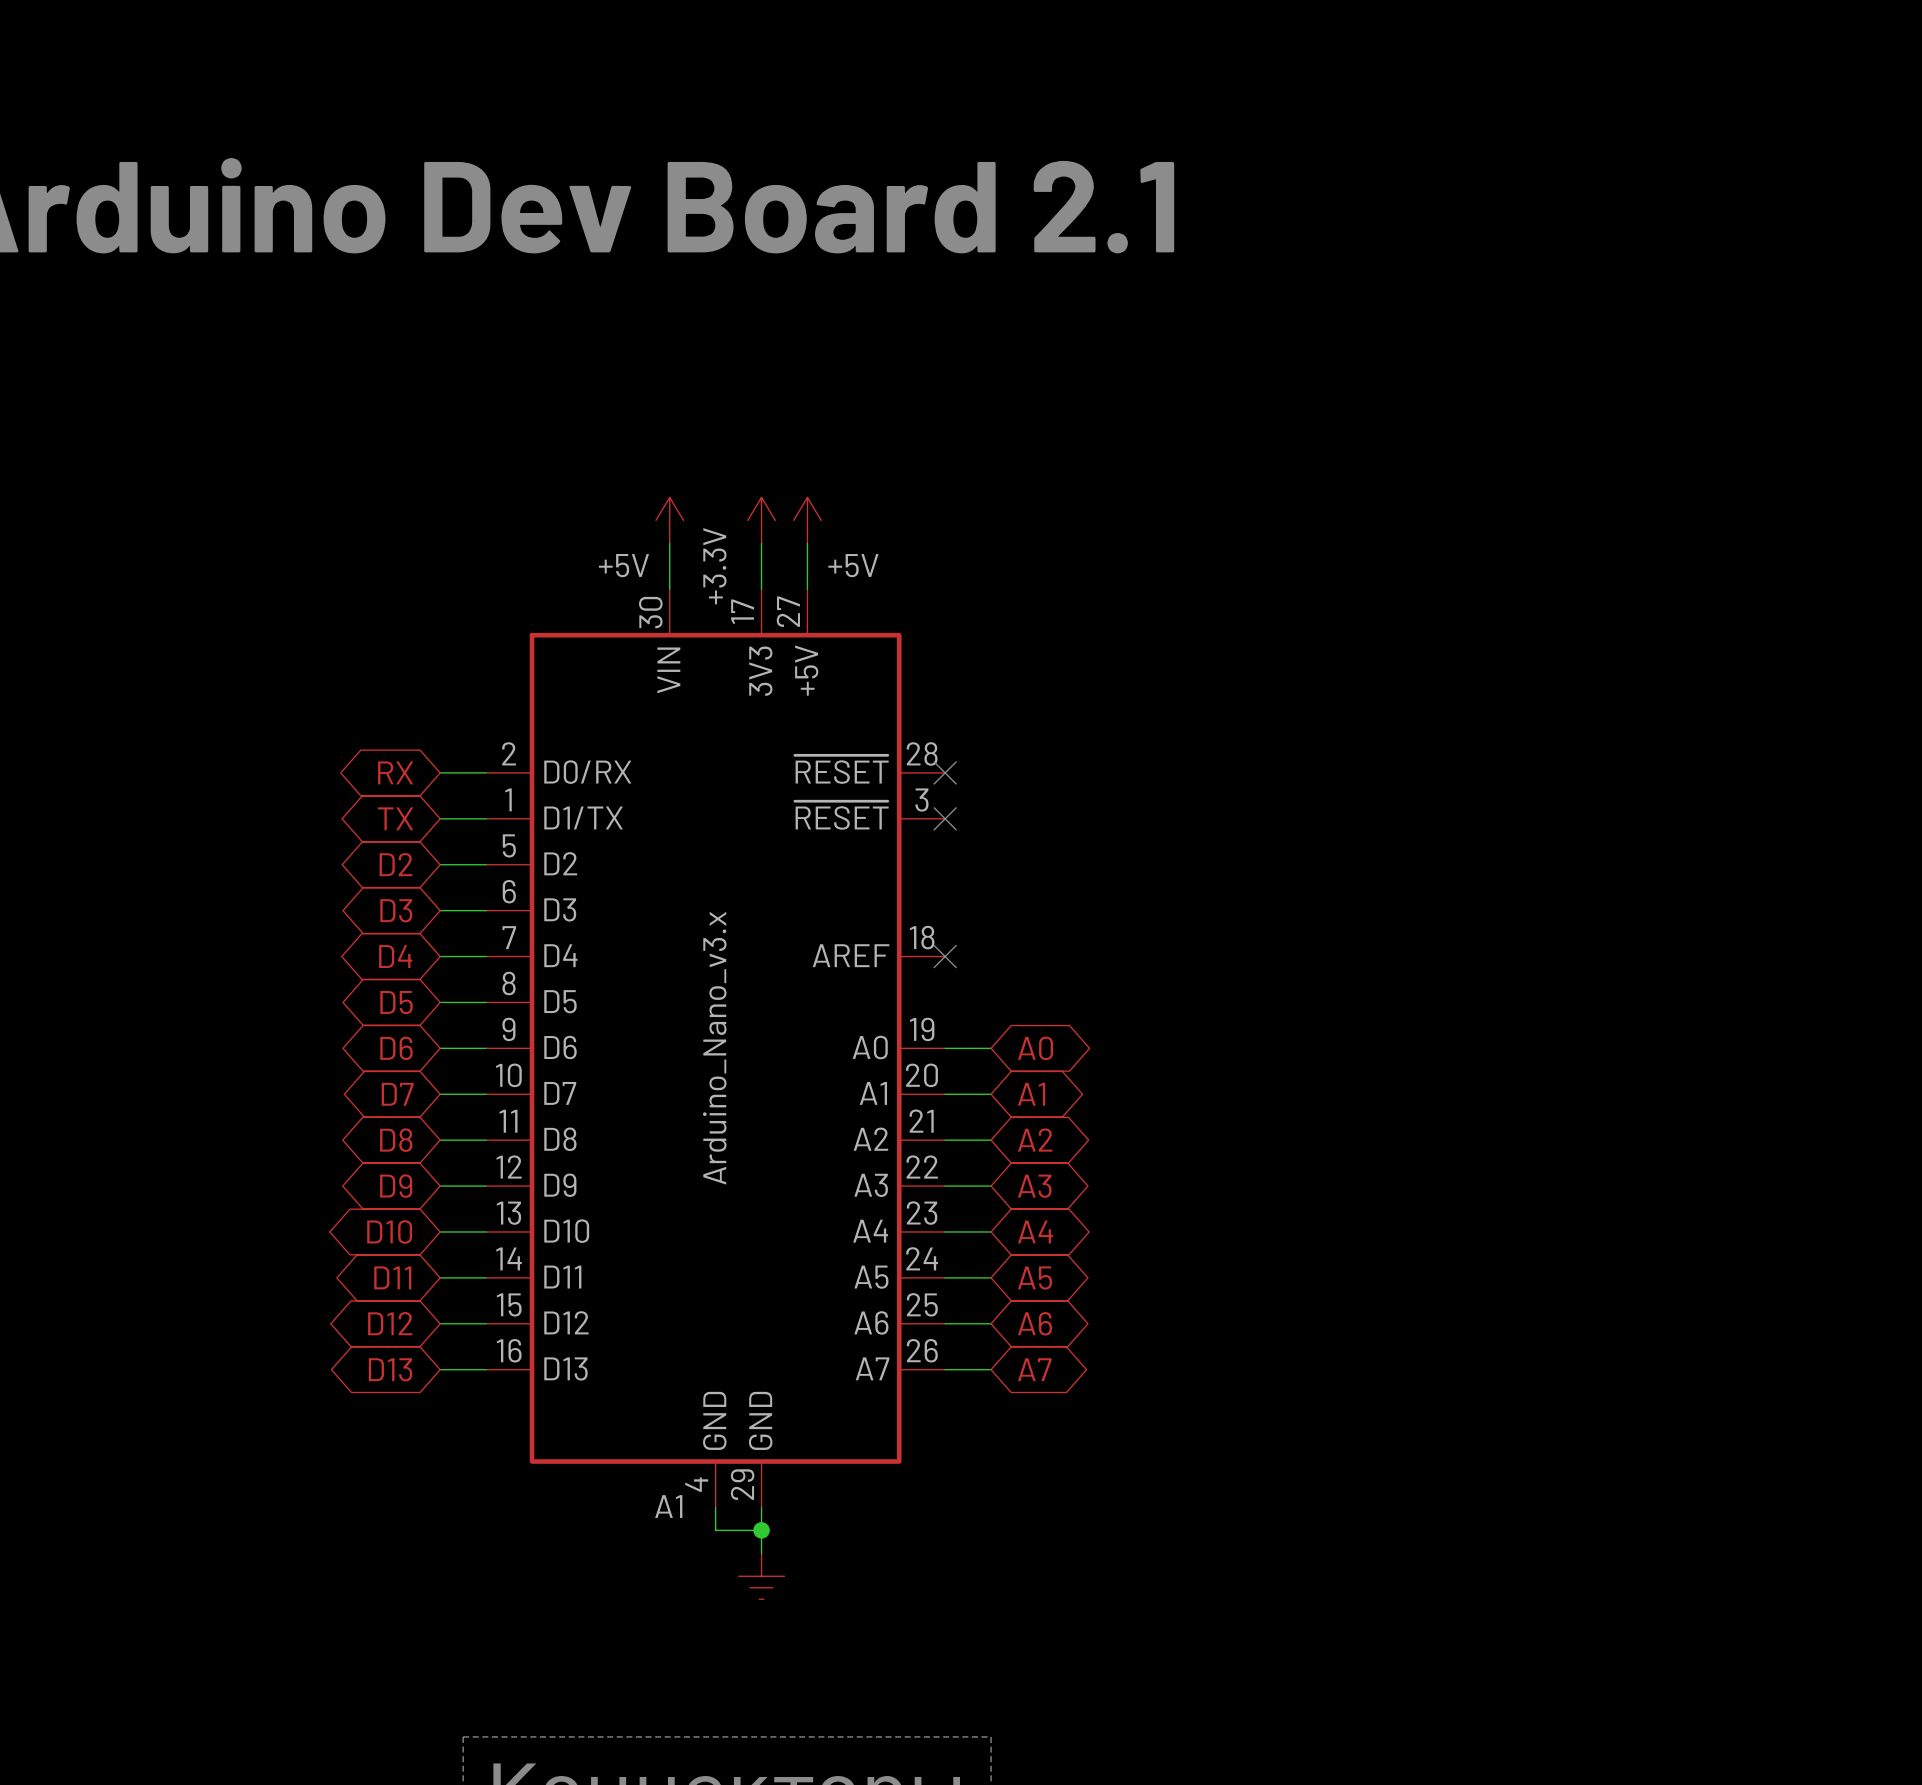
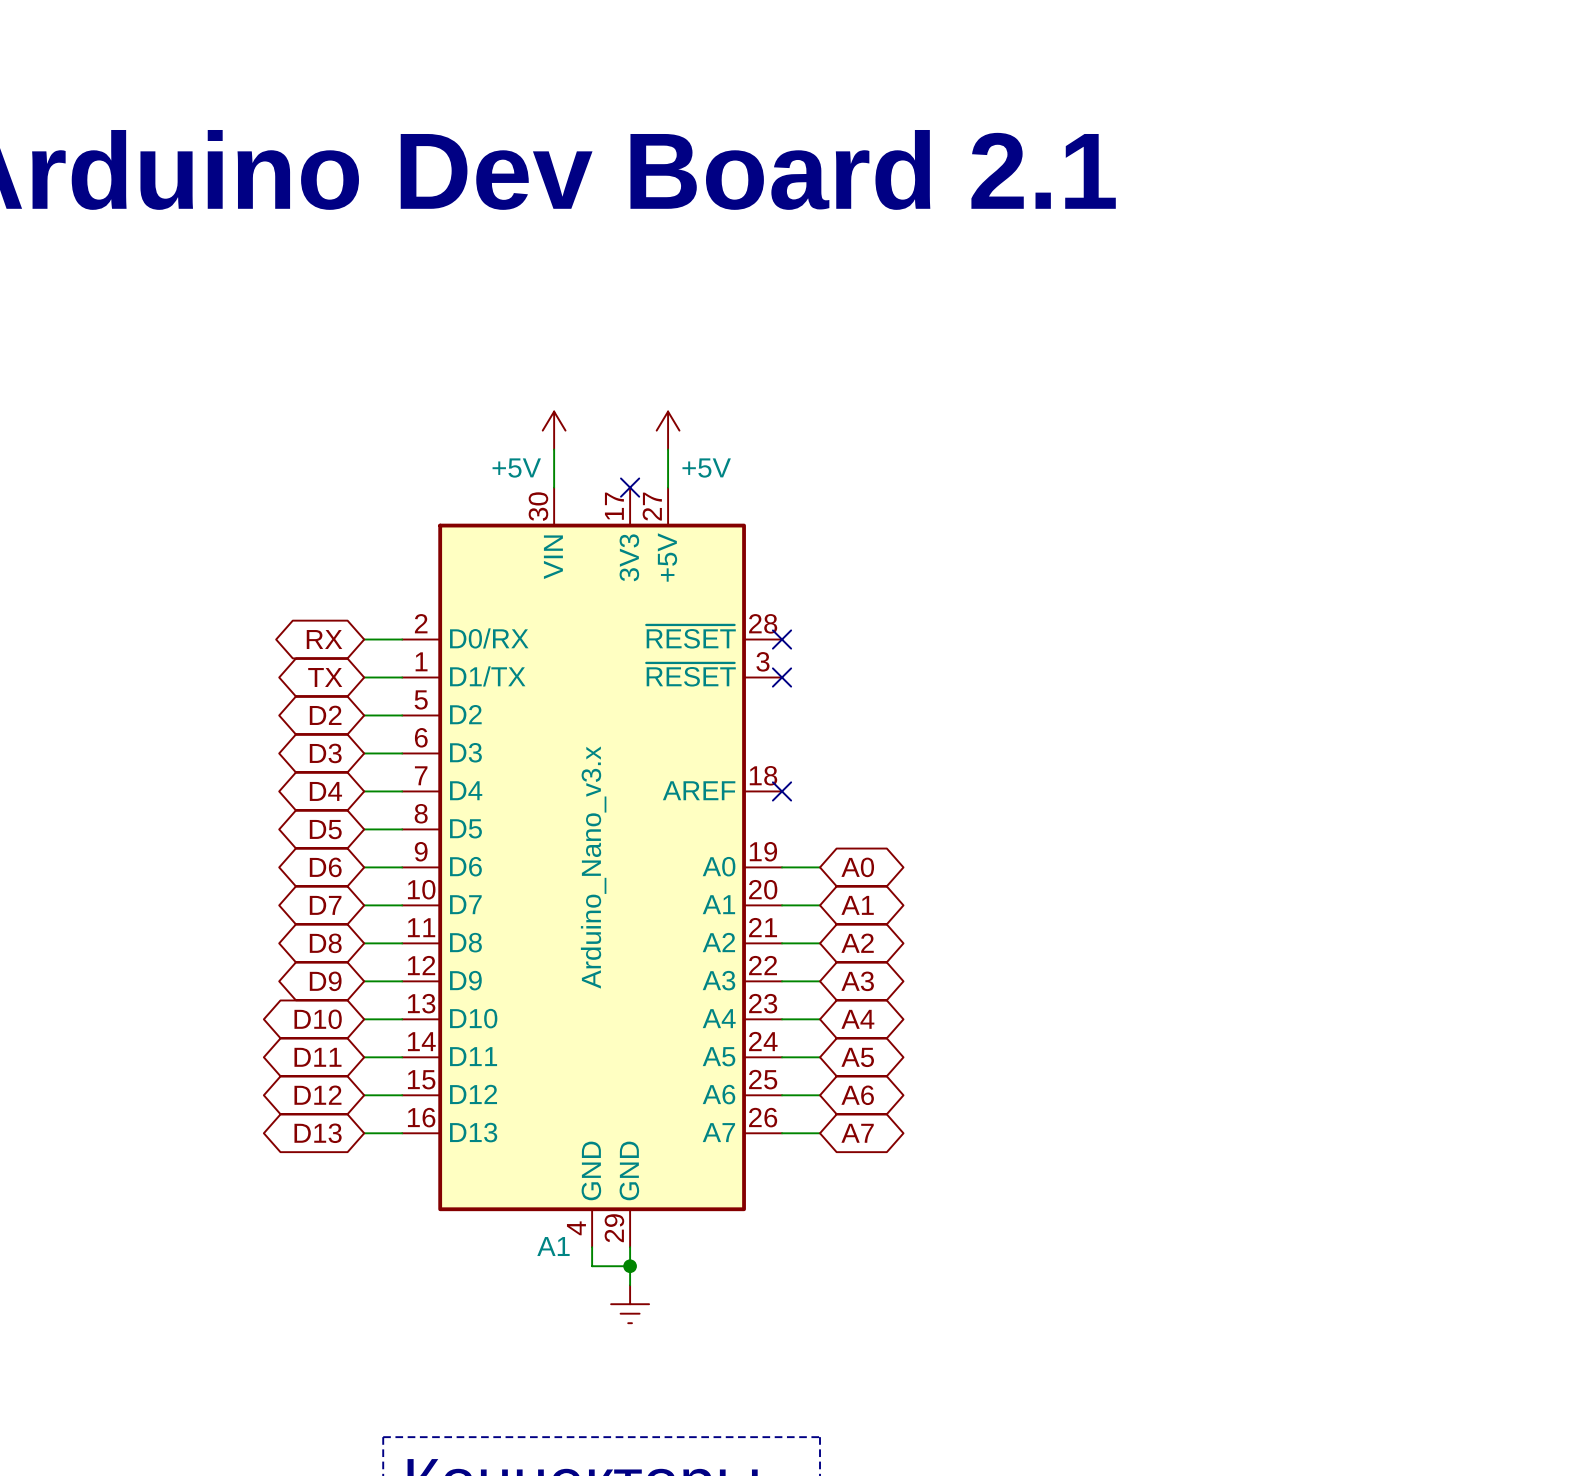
power symbol: +3.3V (761, 520) -> none
wire: (761, 543) (761, 589) -> none
no-connect mark: none -> (630, 487)

